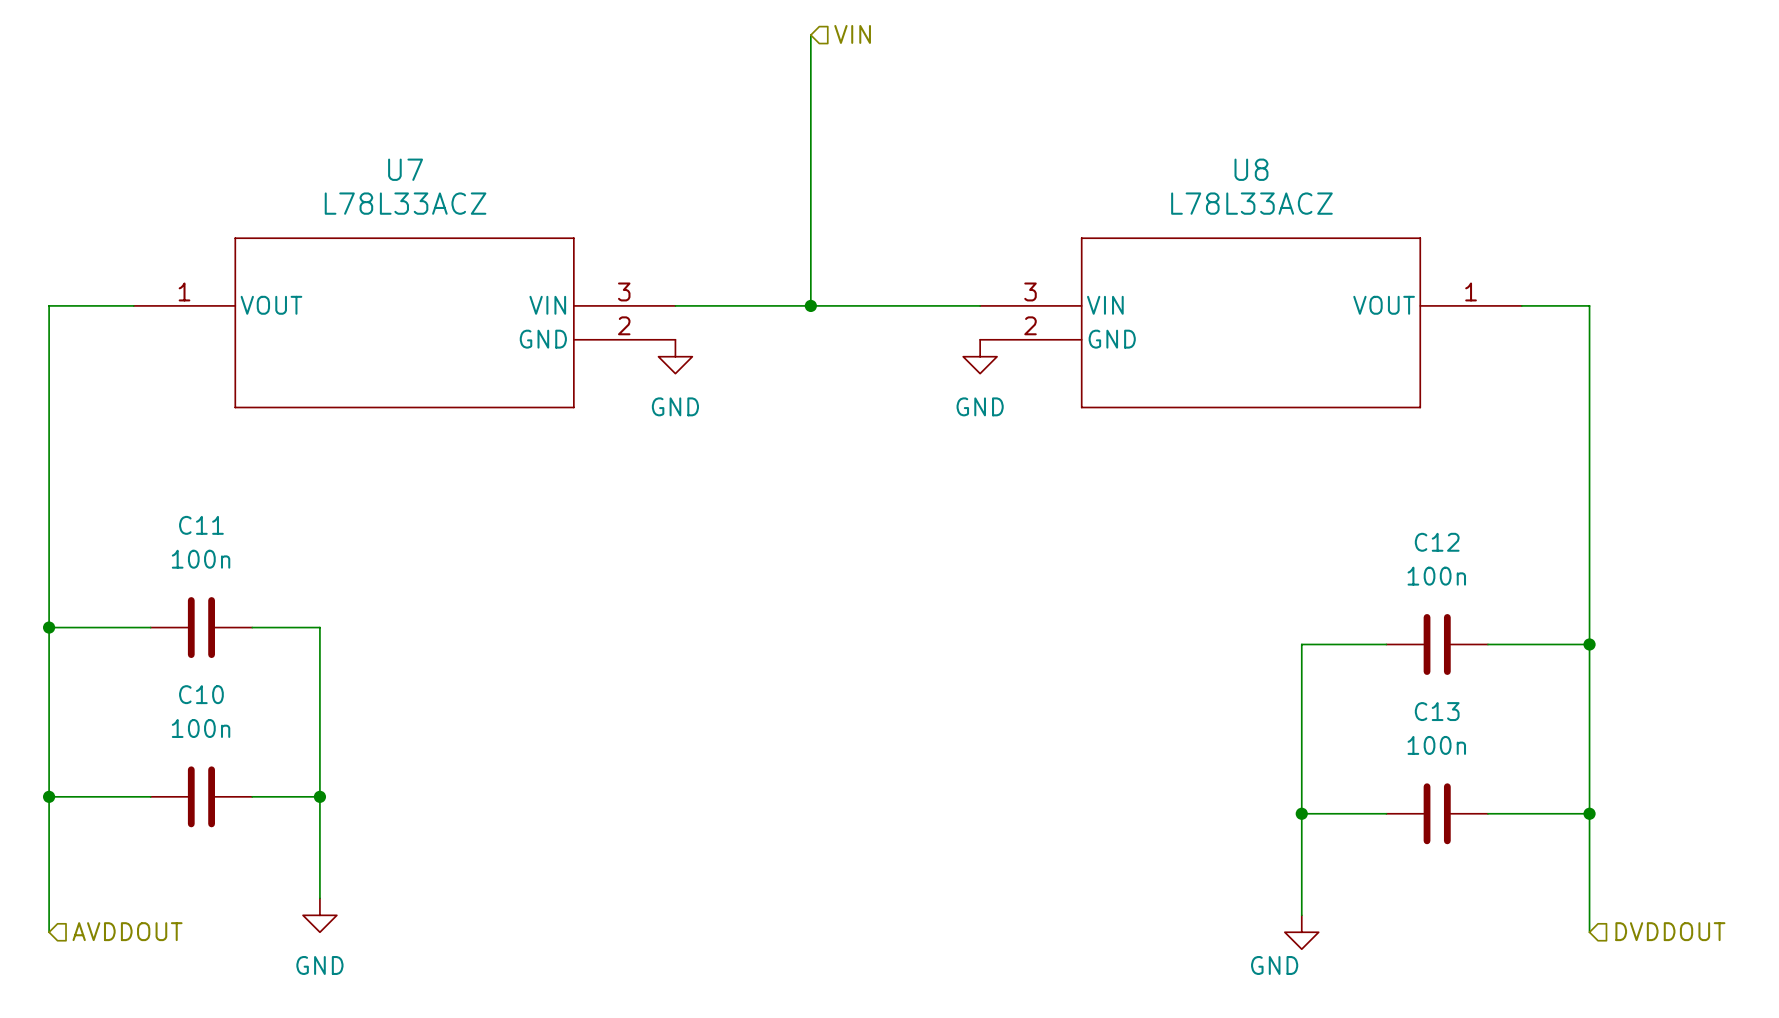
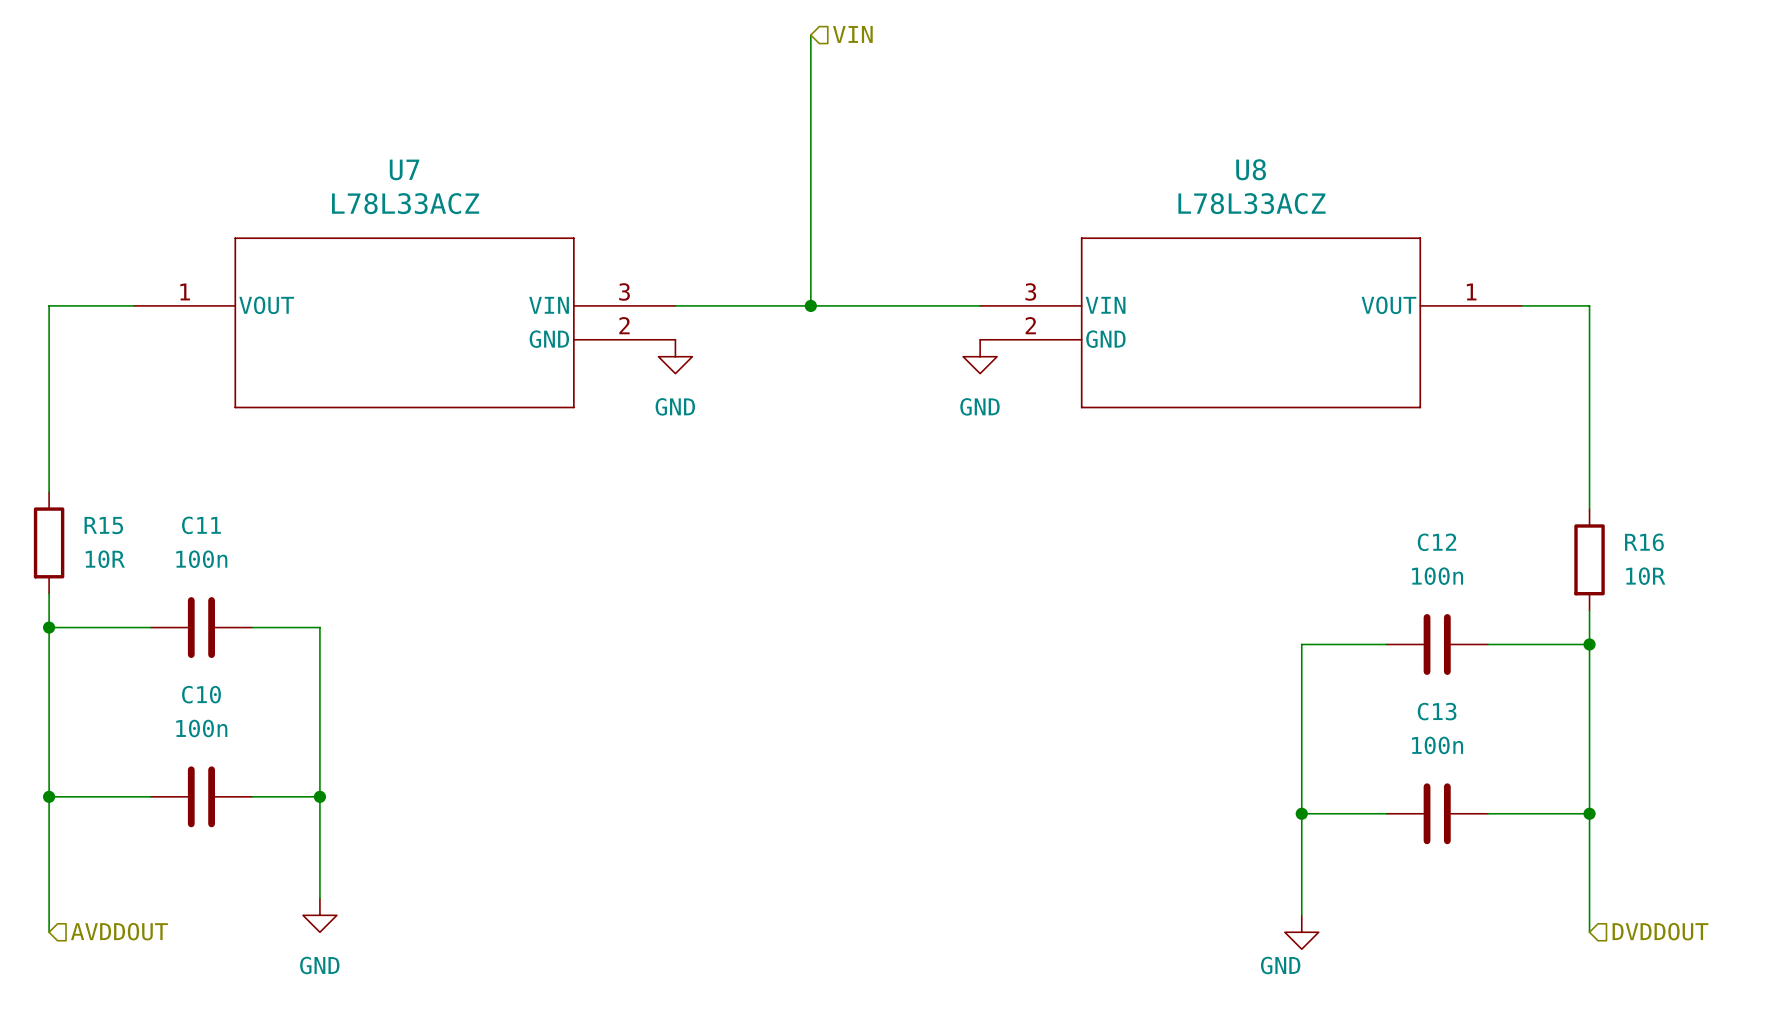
wire: (49, 492) (49, 593) -> none
wire: (1589, 509) (1589, 610) -> none
R15: none -> 10R (49, 542)
R16: none -> 10R (1589, 559)

